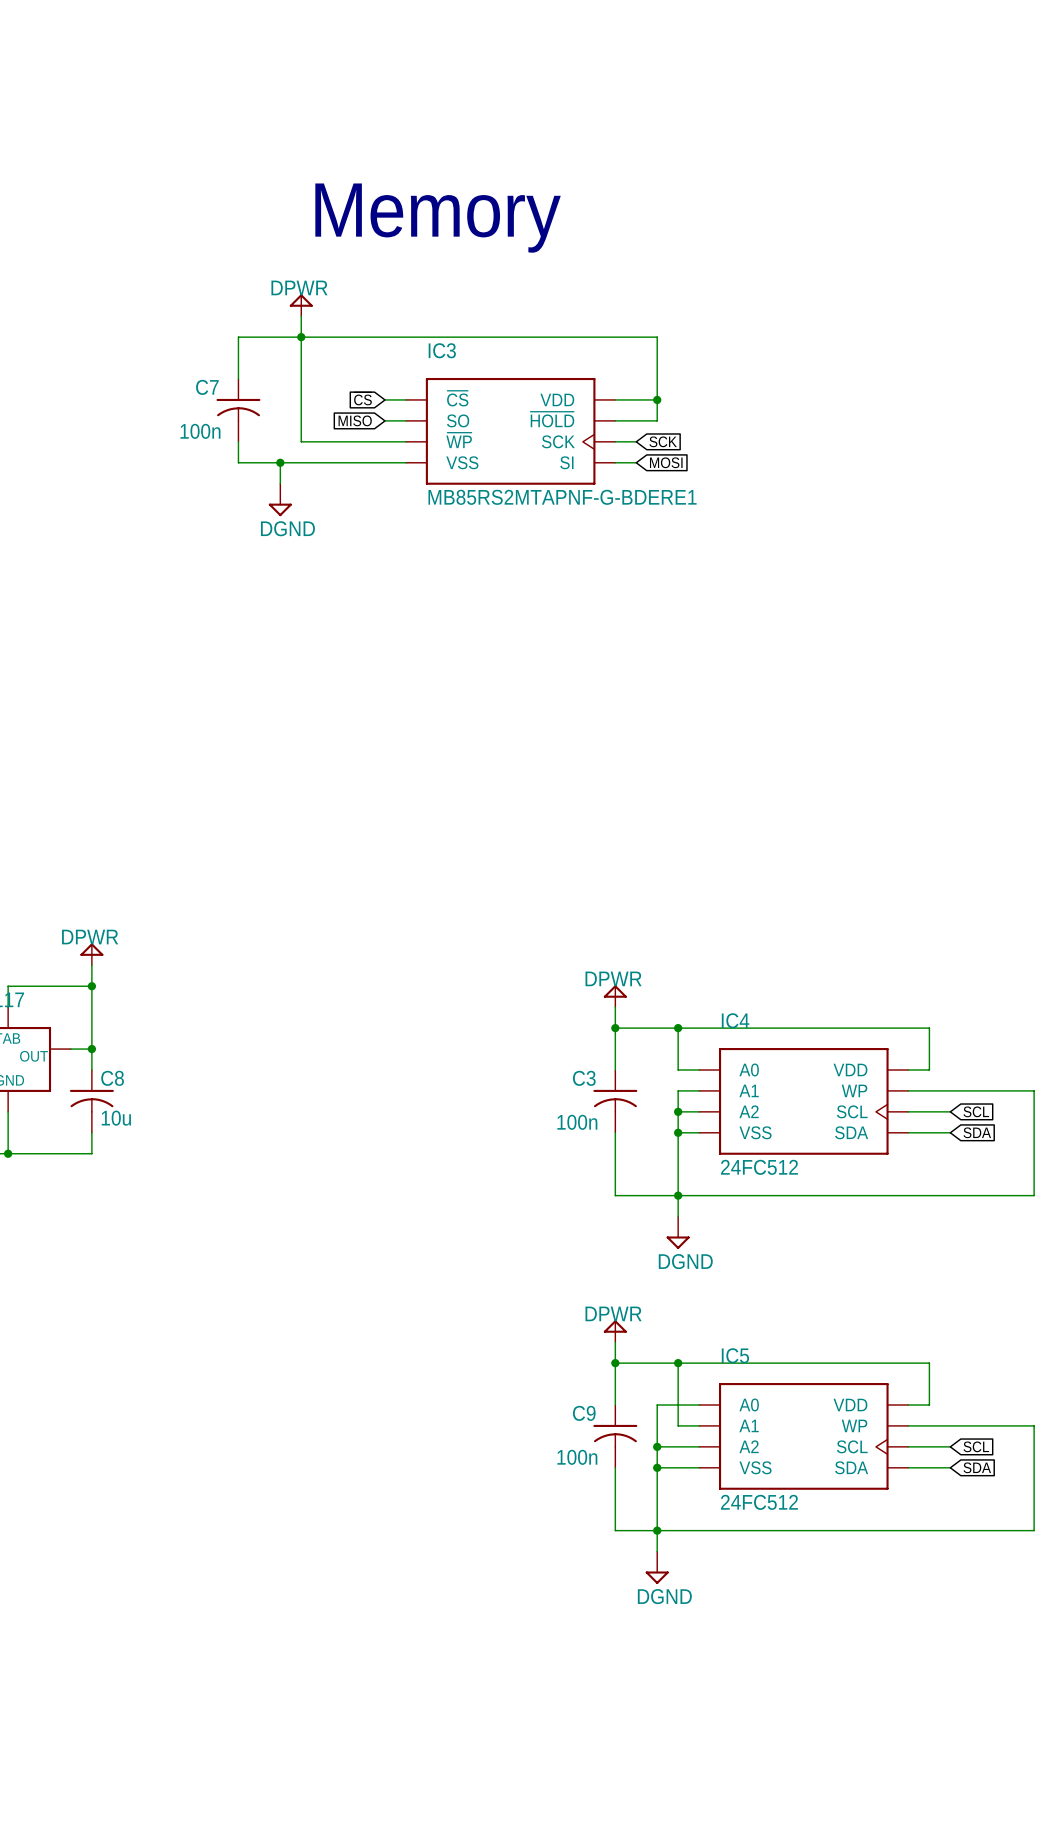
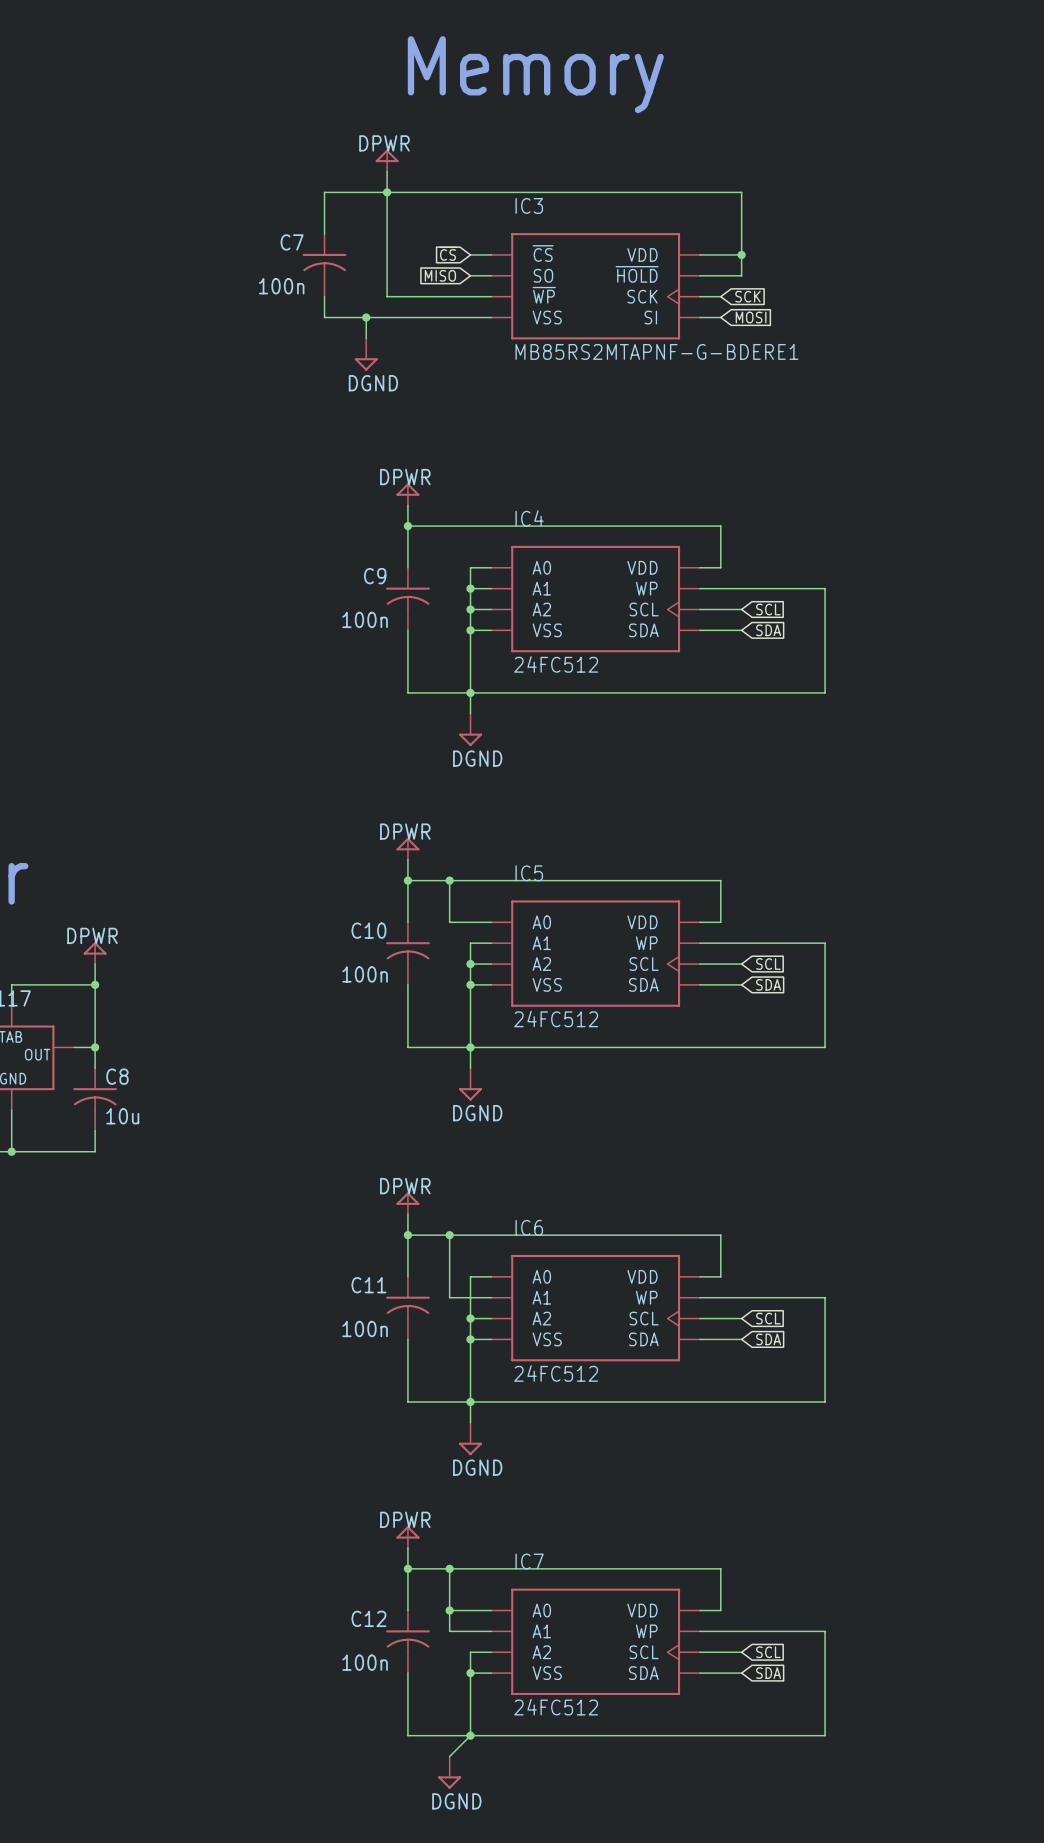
power symbol: none -> DPWR (387, 160)
junction: none -> (387, 192)
text position: Memory (438, 218) -> Memory (535, 74)
junction: none -> (741, 254)
power symbol: DPWR (301, 305) -> none
wire: (301, 316) (301, 441) (405, 441) -> (387, 171) (387, 296) (491, 296)
junction: none -> (366, 317)
junction: (301, 337) -> none
power symbol: none -> DGND (366, 354)
wire: (238, 379) (238, 337) (657, 337) (657, 420) (615, 420) -> (324, 234) (324, 192) (741, 192) (741, 275) (699, 275)
global label position: ~{CS} (362, 398) -> ~{CS} (448, 253)
wire: (385, 399) (405, 399) -> (470, 254) (491, 254)
wire: (615, 399) (657, 399) -> (699, 254) (741, 254)
junction: (657, 399) -> none
C7 position: (238, 410) -> (324, 265)
global label position: MISO (355, 420) -> MISO (440, 275)
wire: (385, 420) (405, 420) -> (470, 275) (491, 275)
IC3 position: (510, 431) -> (595, 286)
wire: (238, 441) (238, 462) (405, 462) -> (324, 296) (324, 317) (491, 317)
wire: (615, 441) (636, 441) -> (699, 296) (720, 296)
global label position: SCK (663, 441) -> SCK (747, 296)
wire: (280, 462) (280, 483) -> (366, 317) (366, 338)
junction: (280, 462) -> none
wire: (615, 462) (636, 462) -> (699, 317) (720, 317)
global label position: MOSI (666, 462) -> MOSI (751, 317)
power symbol: none -> DPWR (407, 494)
power symbol: DGND (280, 499) -> none
wire: none -> (407, 505) (407, 567)
wire: none -> (407, 526) (720, 526) (720, 567) (699, 567)
junction: none -> (407, 526)
wire: none -> (491, 567) (470, 567) (470, 713)
wire: none -> (470, 588) (491, 588)
junction: none -> (470, 588)
wire: none -> (699, 588) (825, 588) (825, 692) (407, 692) (407, 630)
wire: none -> (470, 609) (491, 609)
junction: none -> (470, 609)
wire: none -> (699, 609) (741, 609)
global label: none -> SCL (768, 609)
wire: none -> (470, 630) (491, 630)
junction: none -> (470, 630)
wire: none -> (699, 630) (741, 630)
global label: none -> SDA (768, 630)
junction: none -> (470, 692)
power symbol: none -> DGND (470, 729)
power symbol: none -> DPWR (407, 848)
wire: none -> (407, 859) (407, 922)
wire: none -> (407, 880) (720, 880) (720, 922) (699, 922)
junction: none -> (407, 880)
wire: none -> (449, 880) (449, 922) (491, 922)
junction: none -> (449, 880)
wire: none -> (491, 943) (470, 943) (470, 1068)
wire: none -> (699, 943) (825, 943) (825, 1047) (407, 1047) (407, 984)
C10: none -> 100n (407, 953)
wire: none -> (470, 964) (491, 964)
junction: none -> (470, 964)
wire: none -> (699, 964) (741, 964)
global label: none -> SCL (768, 964)
wire: none -> (470, 984) (491, 984)
junction: none -> (470, 984)
wire: none -> (699, 984) (741, 984)
global label: none -> SDA (768, 984)
power symbol: DPWR (615, 996) -> none
wire: (615, 1007) (615, 1069) -> none
wire: (615, 1028) (929, 1028) (929, 1069) (908, 1069) -> none
junction: (615, 1028) -> none
wire: (678, 1028) (678, 1069) (699, 1069) -> none
junction: (678, 1028) -> none
junction: none -> (470, 1047)
power symbol: none -> DGND (470, 1084)
wire: (699, 1090) (678, 1090) (678, 1216) -> none
wire: (908, 1090) (1034, 1090) (1034, 1195) (615, 1195) (615, 1132) -> none
C3: 100n (615, 1101) -> none
IC4 position: (803, 1101) -> (595, 599)
wire: (678, 1111) (699, 1111) -> none
junction: (678, 1111) -> none
wire: (908, 1111) (950, 1111) -> none
global label: SCL (976, 1111) -> none
wire: (678, 1132) (699, 1132) -> none
junction: (678, 1132) -> none
wire: (908, 1132) (950, 1132) -> none
global label: SDA (977, 1132) -> none
junction: (678, 1195) -> none
power symbol: none -> DPWR (407, 1203)
wire: none -> (407, 1214) (407, 1276)
power symbol: DGND (678, 1232) -> none
wire: none -> (407, 1235) (720, 1235) (720, 1276) (699, 1276)
junction: none -> (407, 1235)
wire: none -> (449, 1235) (449, 1297) (491, 1297)
junction: none -> (449, 1235)
wire: none -> (491, 1276) (470, 1276) (470, 1422)
wire: none -> (699, 1297) (825, 1297) (825, 1401) (699, 1401)
C11: none -> 100n (407, 1308)
IC6: none -> 24FC512 (595, 1308)
wire: none -> (470, 1318) (491, 1318)
junction: none -> (470, 1318)
global label: none -> SCL (768, 1318)
power symbol: DPWR (615, 1331) -> none
wire: none -> (470, 1339) (491, 1339)
junction: none -> (470, 1339)
wire: (615, 1342) (615, 1405) -> none
global label: none -> SDA (768, 1339)
wire: (615, 1363) (929, 1363) (929, 1405) (908, 1405) -> none
junction: (615, 1363) -> none
wire: (678, 1363) (678, 1425) (699, 1425) -> none
junction: (678, 1363) -> none
junction: none -> (470, 1401)
wire: (657, 1405) (657, 1551) -> (658, 1401) (407, 1401) (407, 1339)
wire: (908, 1425) (1034, 1425) (1034, 1530) (615, 1530) (615, 1467) -> none
C9 position: (615, 1436) -> (407, 599)
IC5 position: (803, 1436) -> (595, 953)
power symbol: none -> DGND (470, 1439)
wire: (657, 1446) (699, 1446) -> (699, 1318) (741, 1318)
junction: (657, 1446) -> none
wire: (908, 1446) (950, 1446) -> none
global label: SCL (976, 1446) -> none
wire: (657, 1467) (699, 1467) -> (699, 1339) (741, 1339)
junction: (657, 1467) -> none
wire: (908, 1467) (950, 1467) -> none
global label: SDA (977, 1467) -> none
junction: (657, 1530) -> none
power symbol: none -> DPWR (407, 1537)
wire: none -> (407, 1547) (407, 1610)
power symbol: DGND (657, 1567) -> none
wire: none -> (407, 1568) (720, 1568) (720, 1610) (699, 1610)
junction: none -> (407, 1568)
wire: none -> (449, 1568) (449, 1631) (491, 1631)
junction: none -> (449, 1568)
wire: none -> (449, 1610) (491, 1610)
junction: none -> (449, 1610)
wire: none -> (699, 1631) (825, 1631) (825, 1735) (407, 1735) (407, 1673)
C12: none -> 100n (407, 1641)
IC7: none -> 24FC512 (595, 1641)
wire: none -> (491, 1652) (470, 1652) (470, 1735) (449, 1756)
wire: none -> (699, 1652) (741, 1652)
global label: none -> SCL (768, 1652)
wire: none -> (470, 1673) (491, 1673)
junction: none -> (470, 1673)
wire: none -> (699, 1673) (741, 1673)
global label: none -> SDA (768, 1673)
junction: none -> (470, 1735)
power symbol: none -> DGND (449, 1772)

